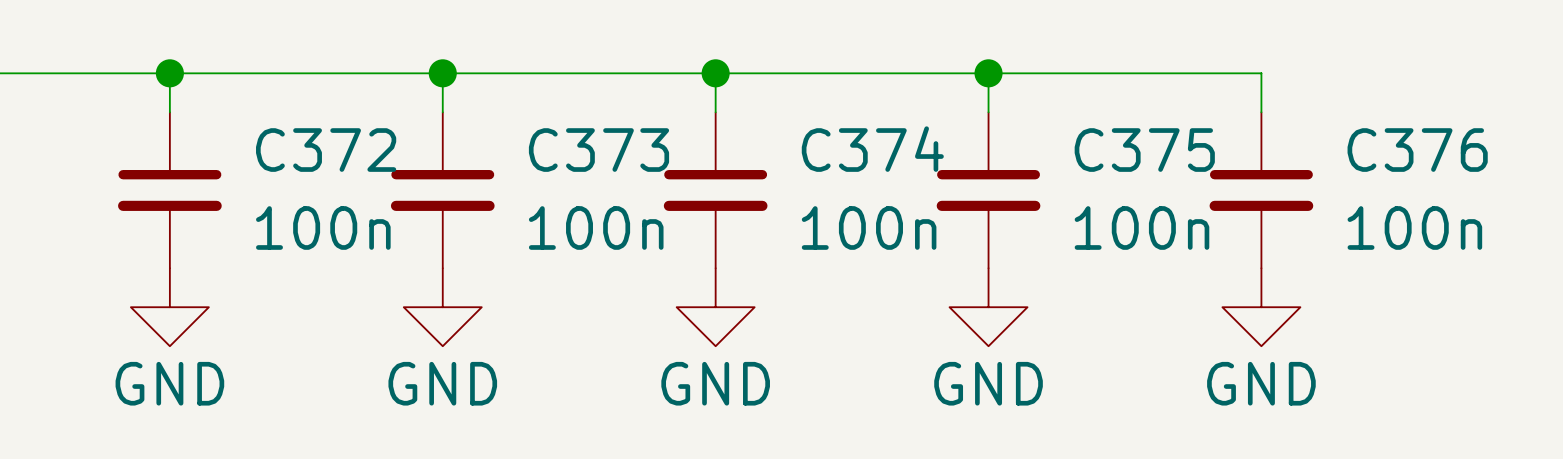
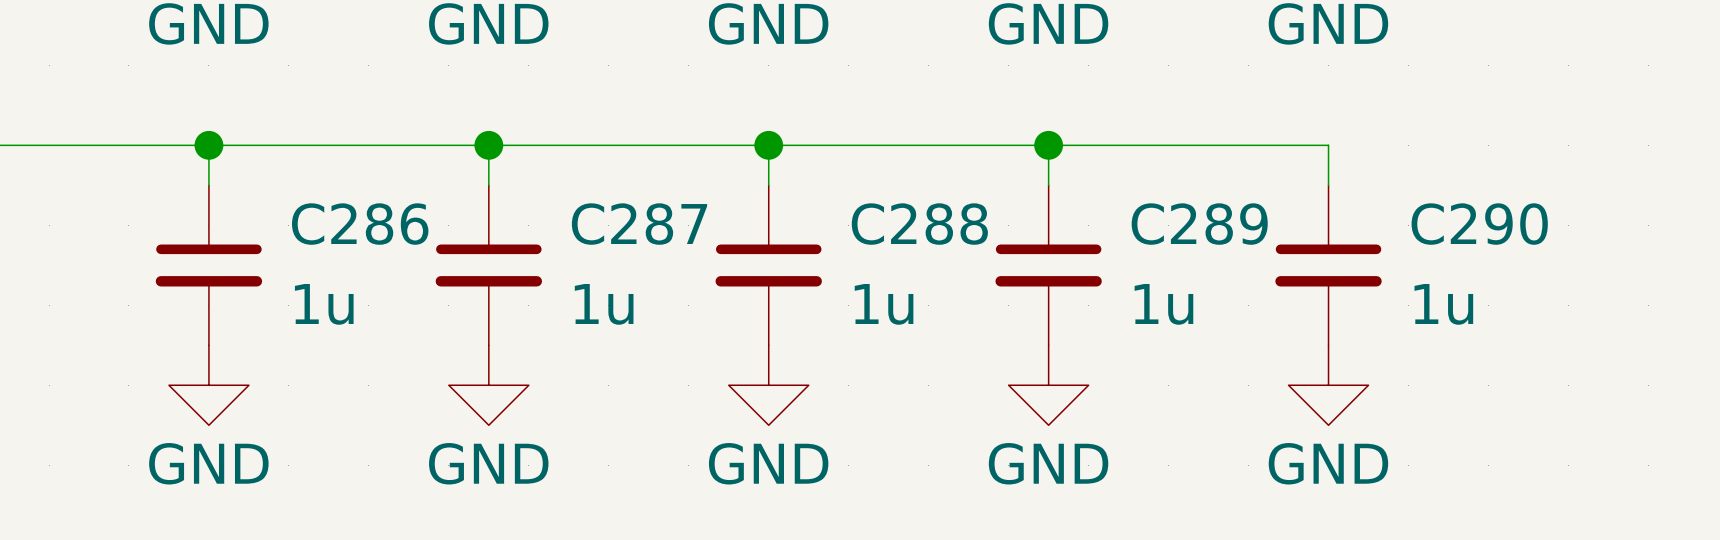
C374 name: C374 (872, 149) -> C288 (919, 224)
C372 name: C372 (326, 150) -> C286 (360, 224)
C373 name: C373 (598, 150) -> C287 (639, 224)
C375 name: C375 (1144, 150) -> C289 (1199, 224)
C376 name: C376 (1417, 150) -> C290 (1479, 224)
C372 value: 100n (323, 227) -> 1u (324, 304)
C373 value: 100n (596, 227) -> 1u (604, 304)
C374 value: 100n (869, 227) -> 1u (884, 304)
C375 value: 100n (1141, 227) -> 1u (1163, 304)
C376 value: 100n (1414, 227) -> 1u (1443, 304)

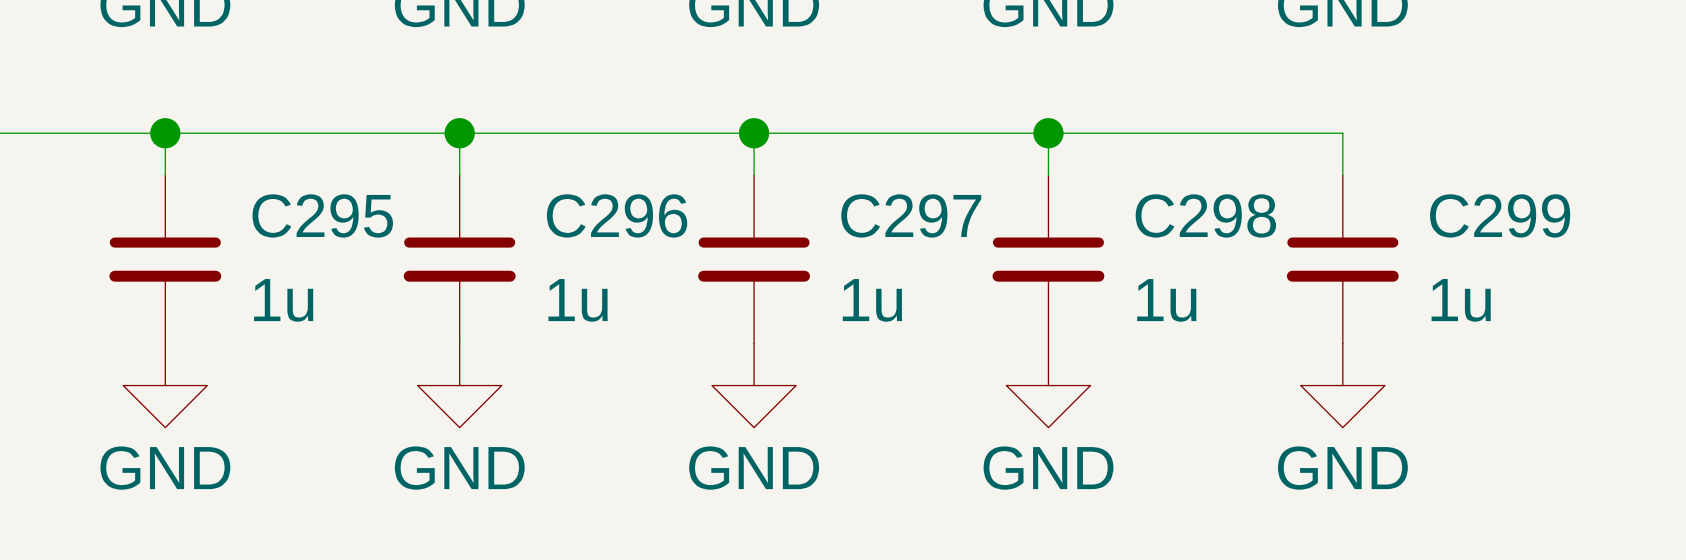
C286 name: C286 (360, 224) -> C295 (322, 215)
C287 name: C287 (639, 224) -> C296 (617, 215)
C288 name: C288 (919, 224) -> C297 (911, 215)
C289 name: C289 (1199, 224) -> C298 (1205, 215)
C290 name: C290 (1479, 224) -> C299 (1500, 215)

